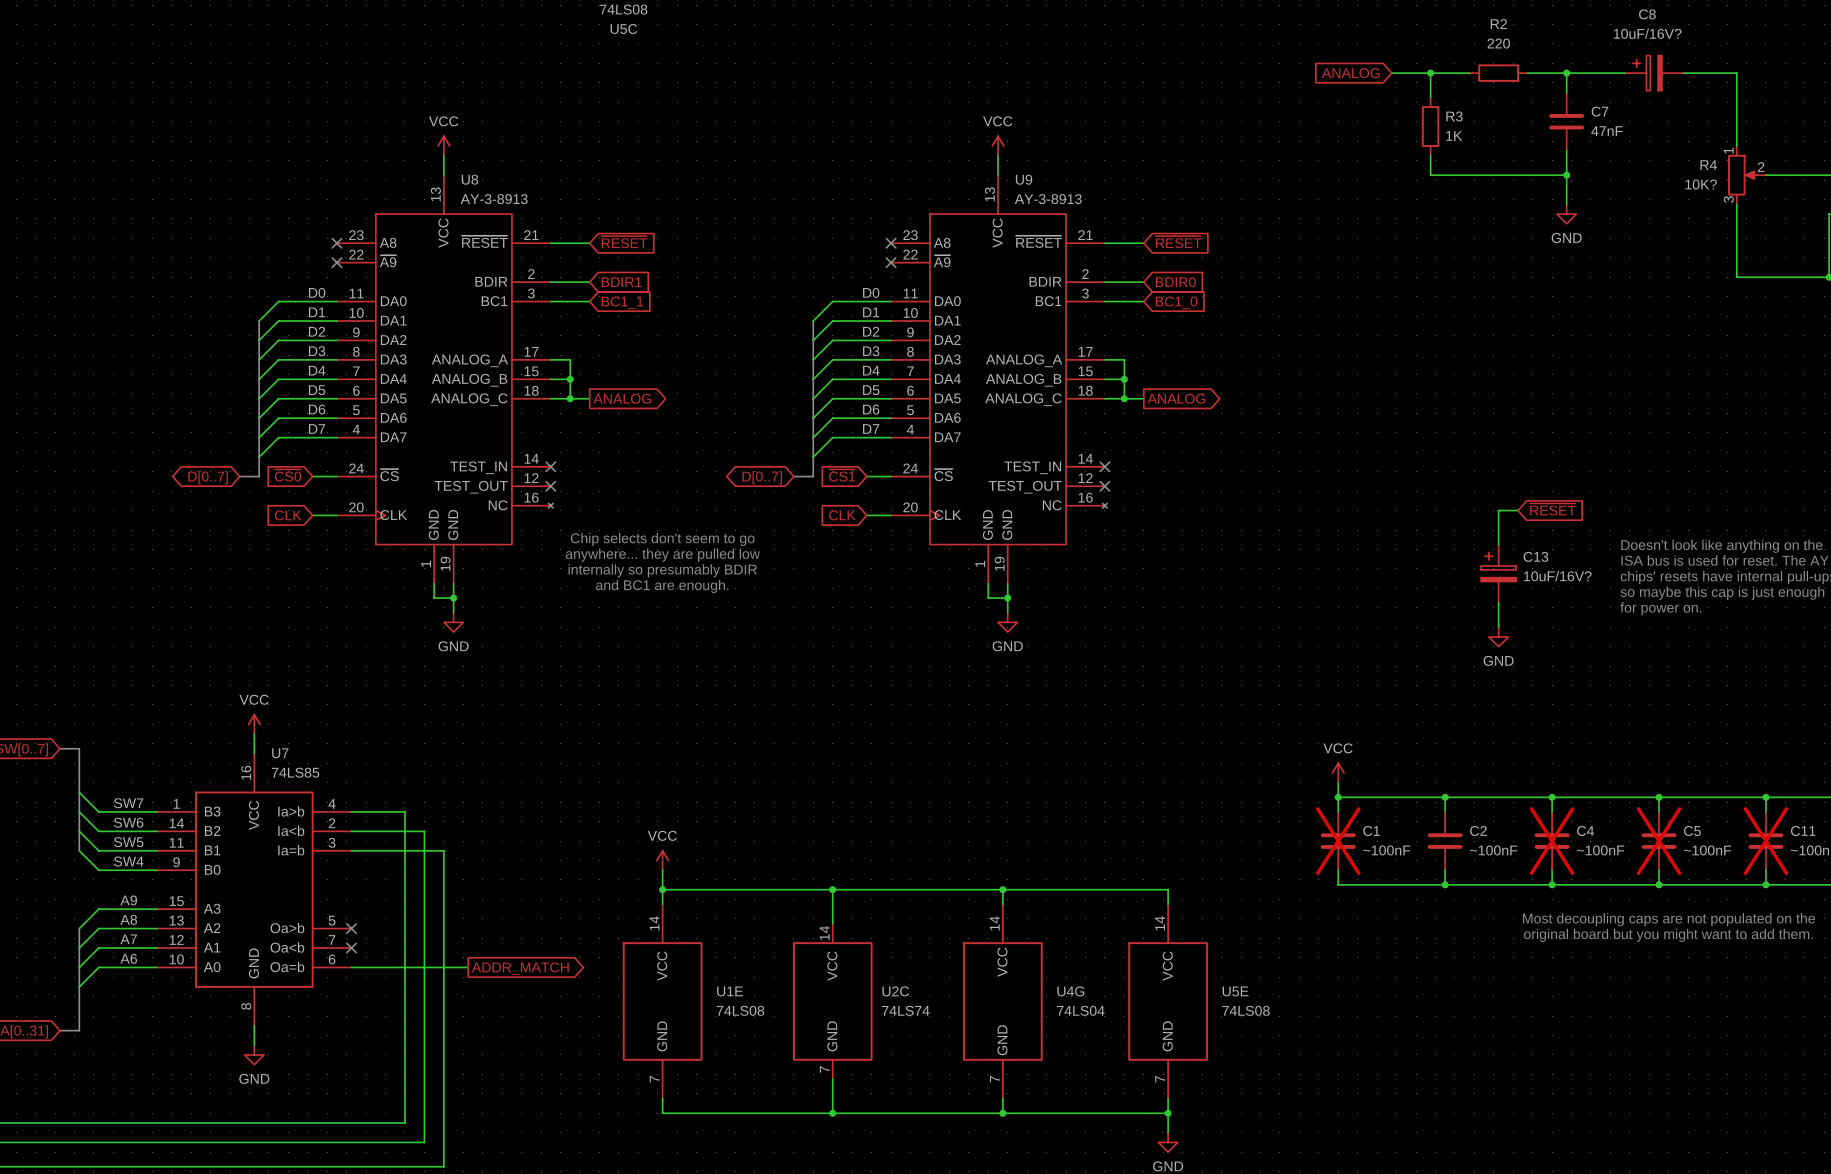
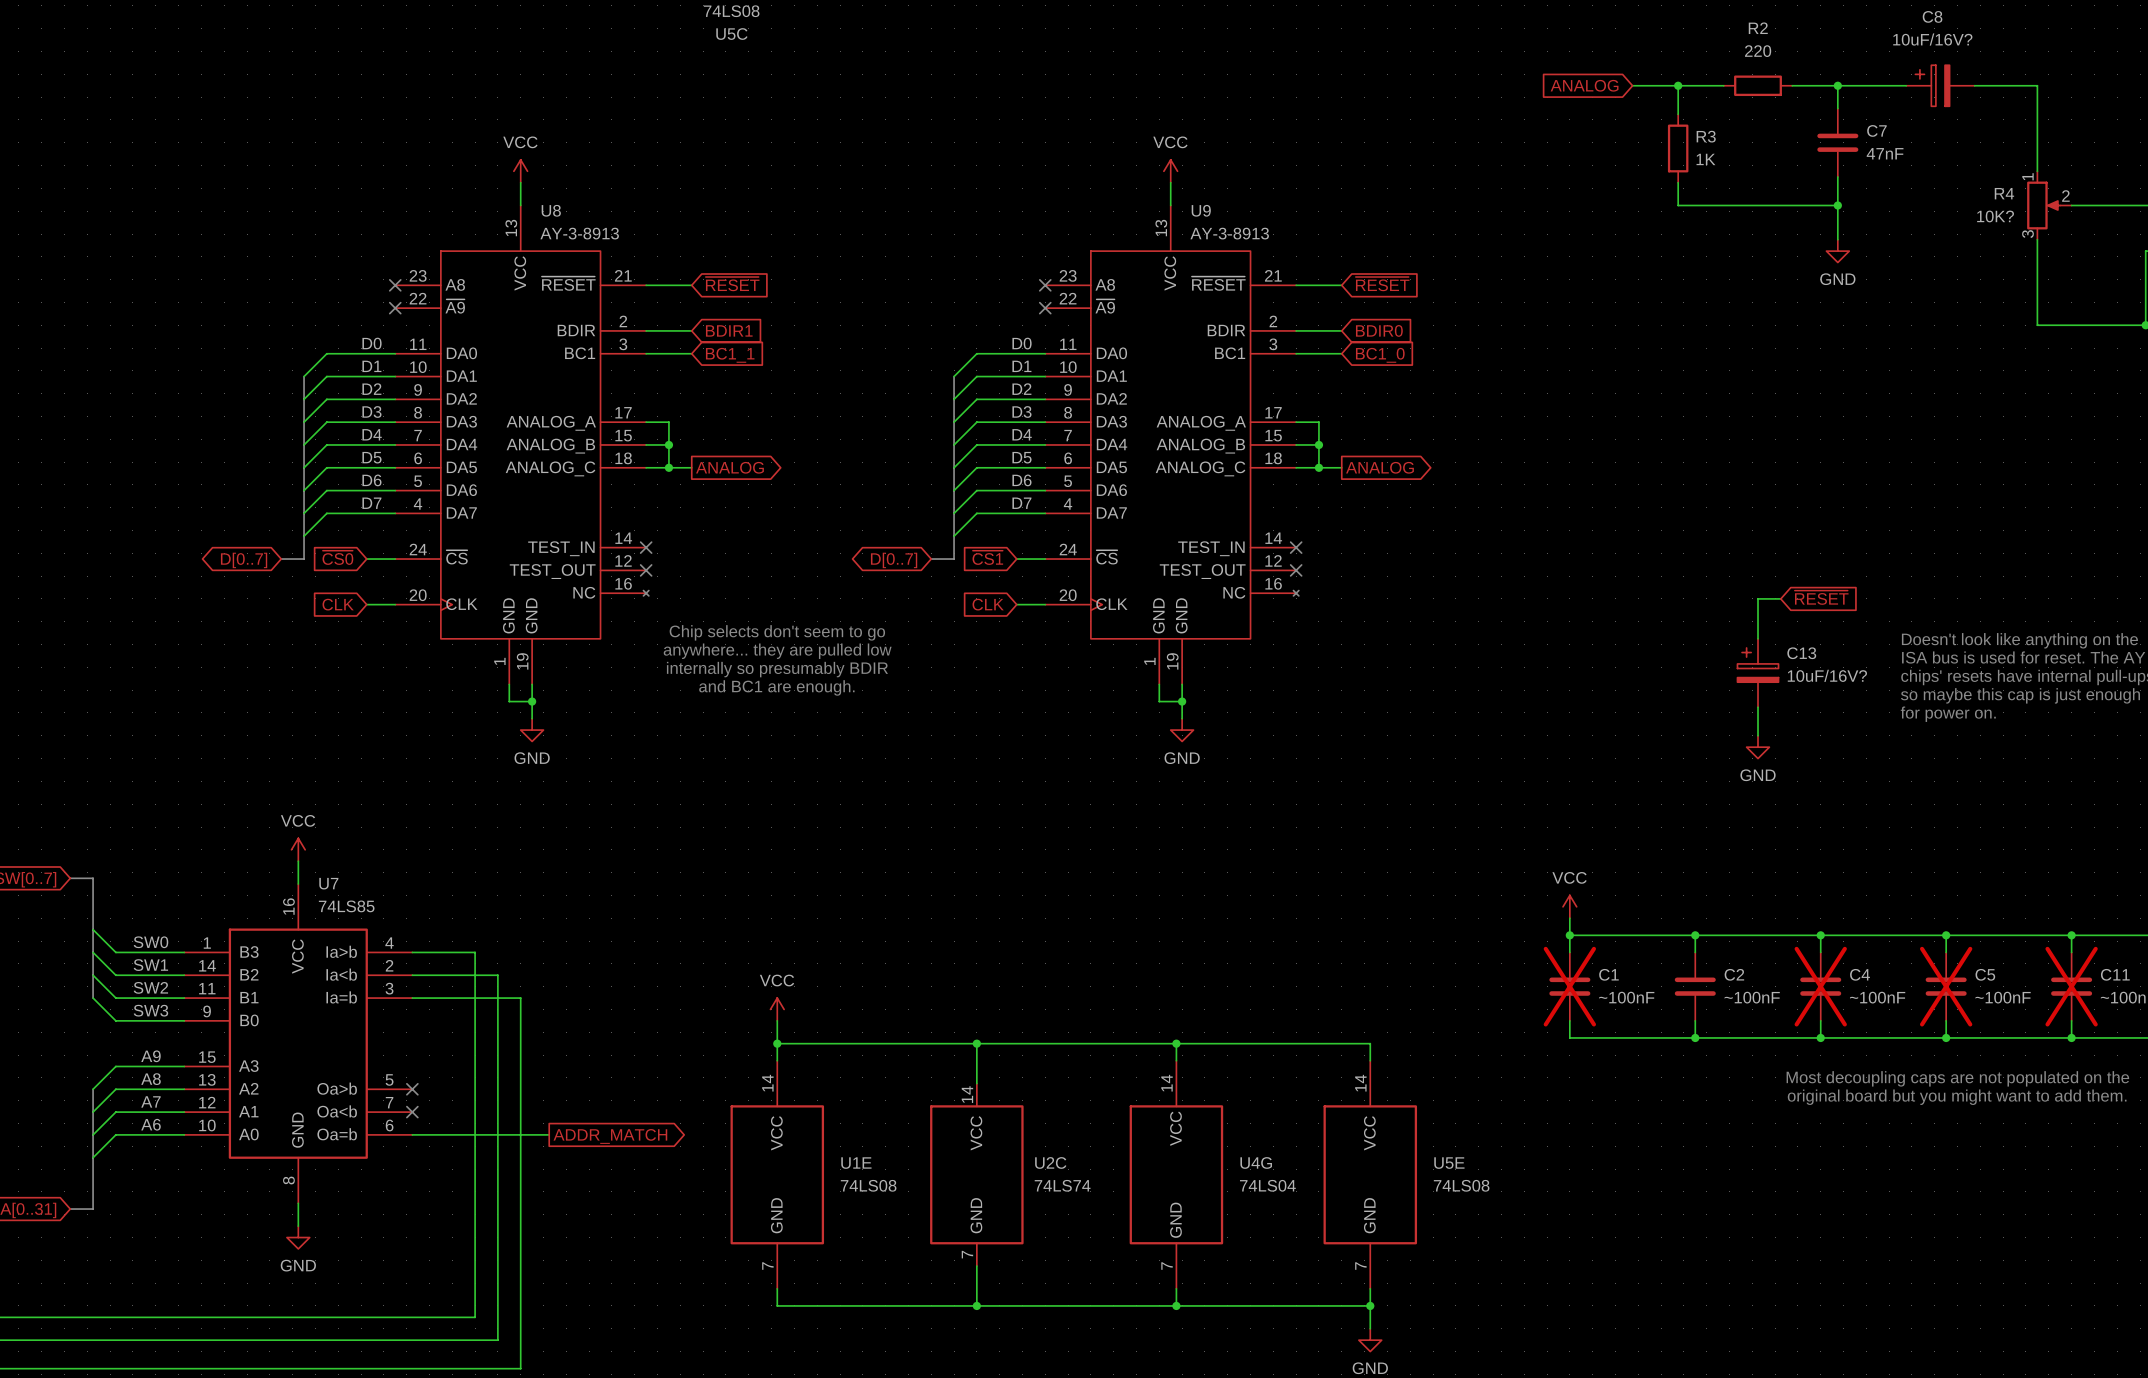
label: SW7 (128, 803) -> SW0 (150, 942)
label: SW6 (128, 822) -> SW1 (150, 965)
label: SW5 (128, 842) -> SW2 (150, 987)
label: SW4 (128, 861) -> SW3 (150, 1010)

